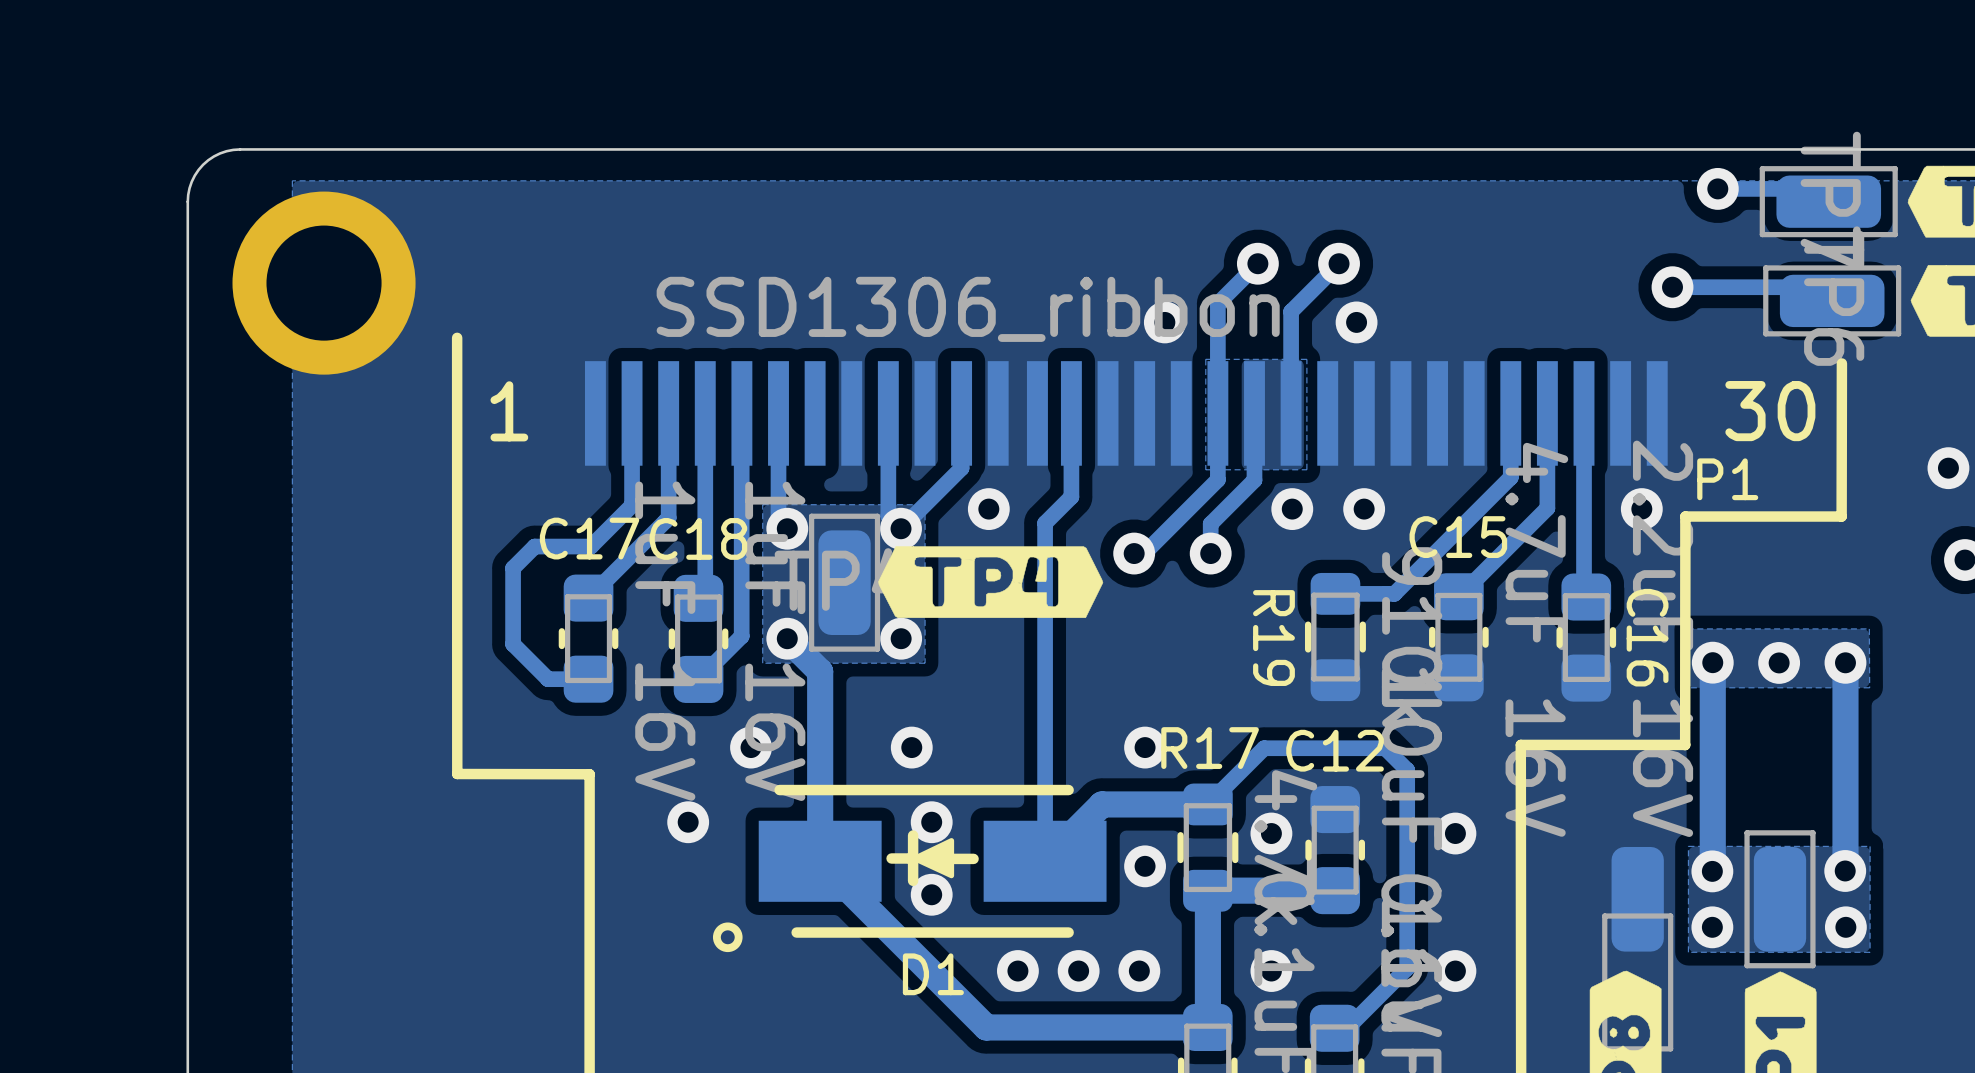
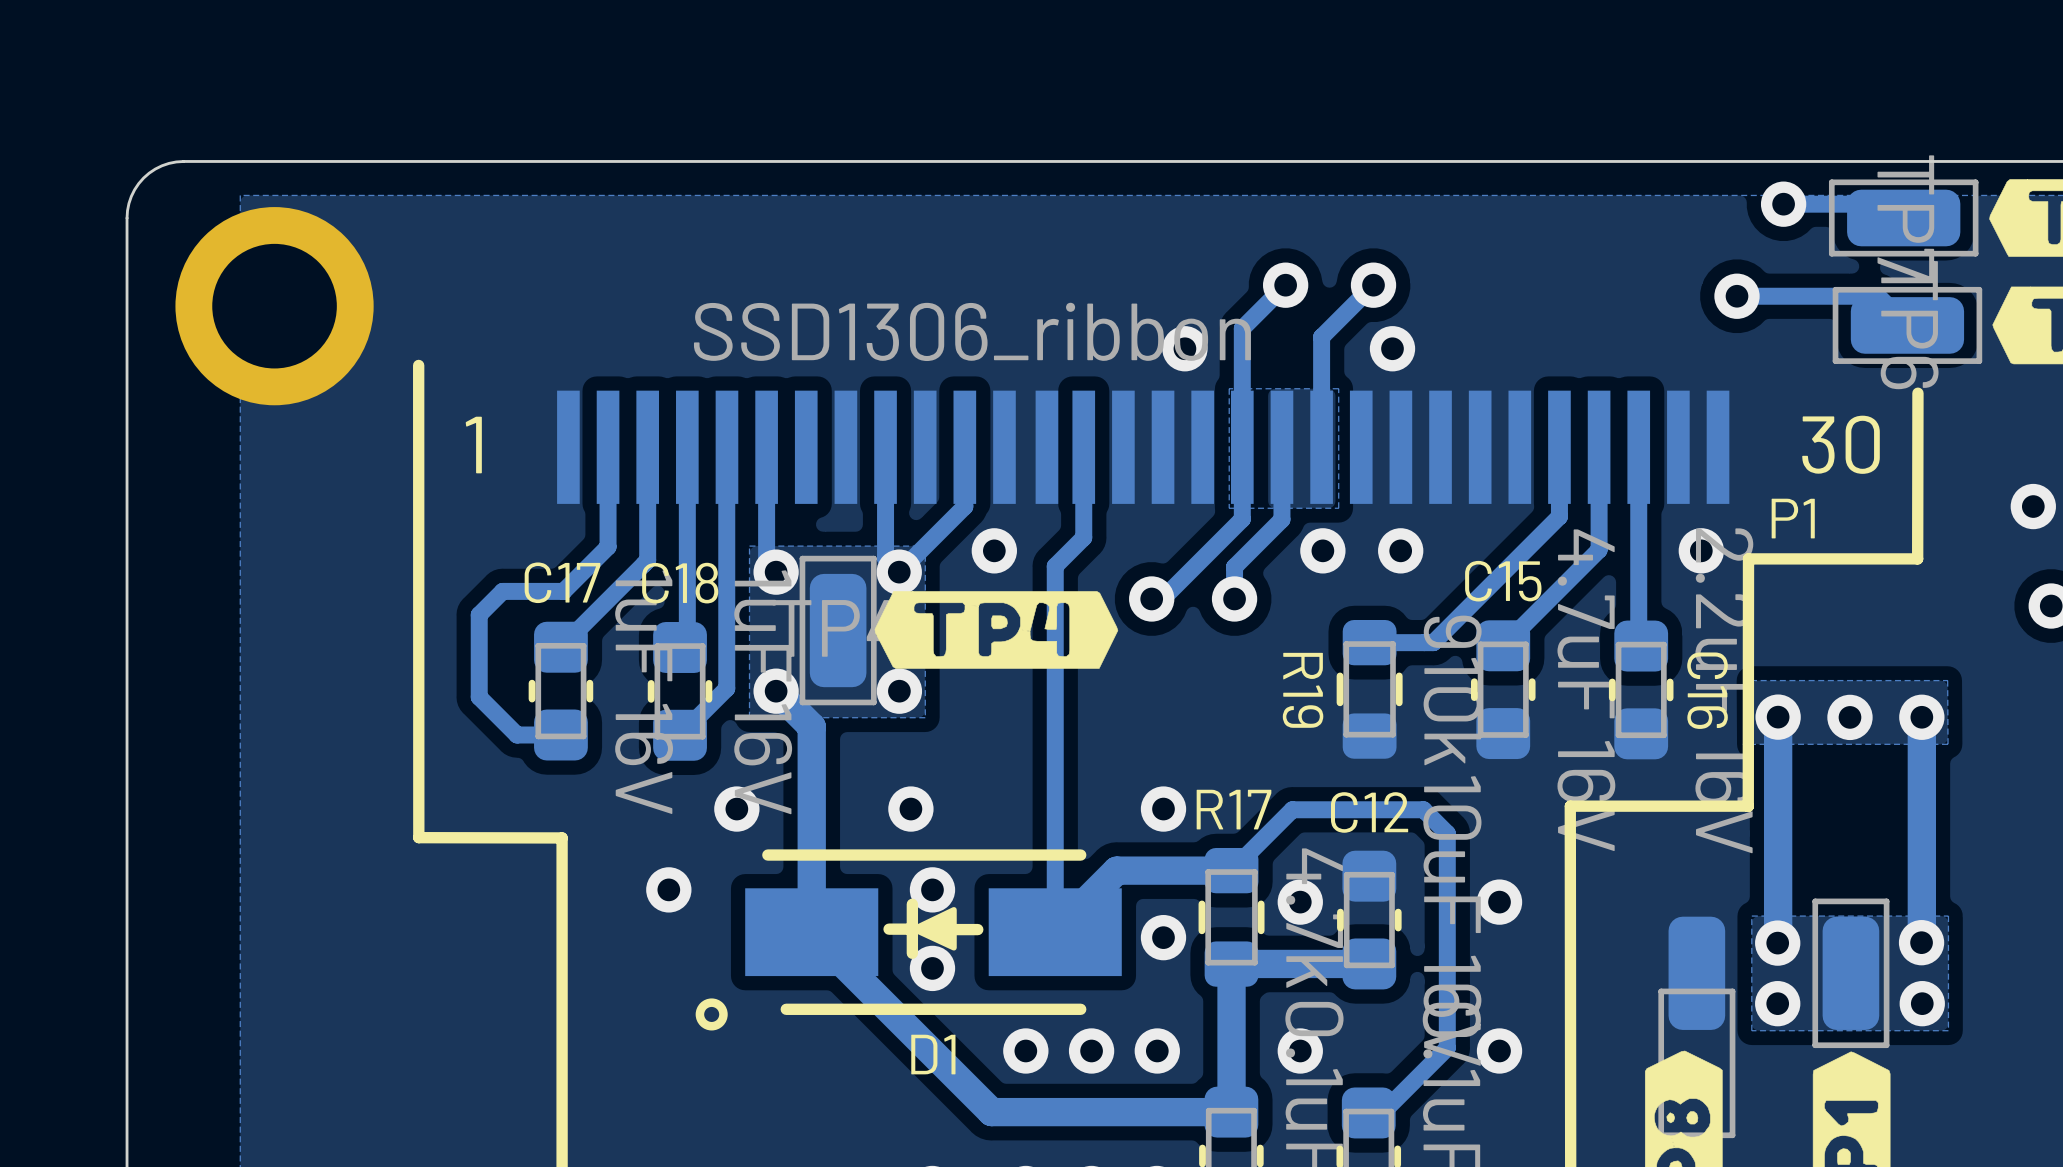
via position: (1672, 287) -> (1737, 296)
track: (1818, 287) (1672, 287) -> (1892, 310) (1878, 296) (1737, 296)

